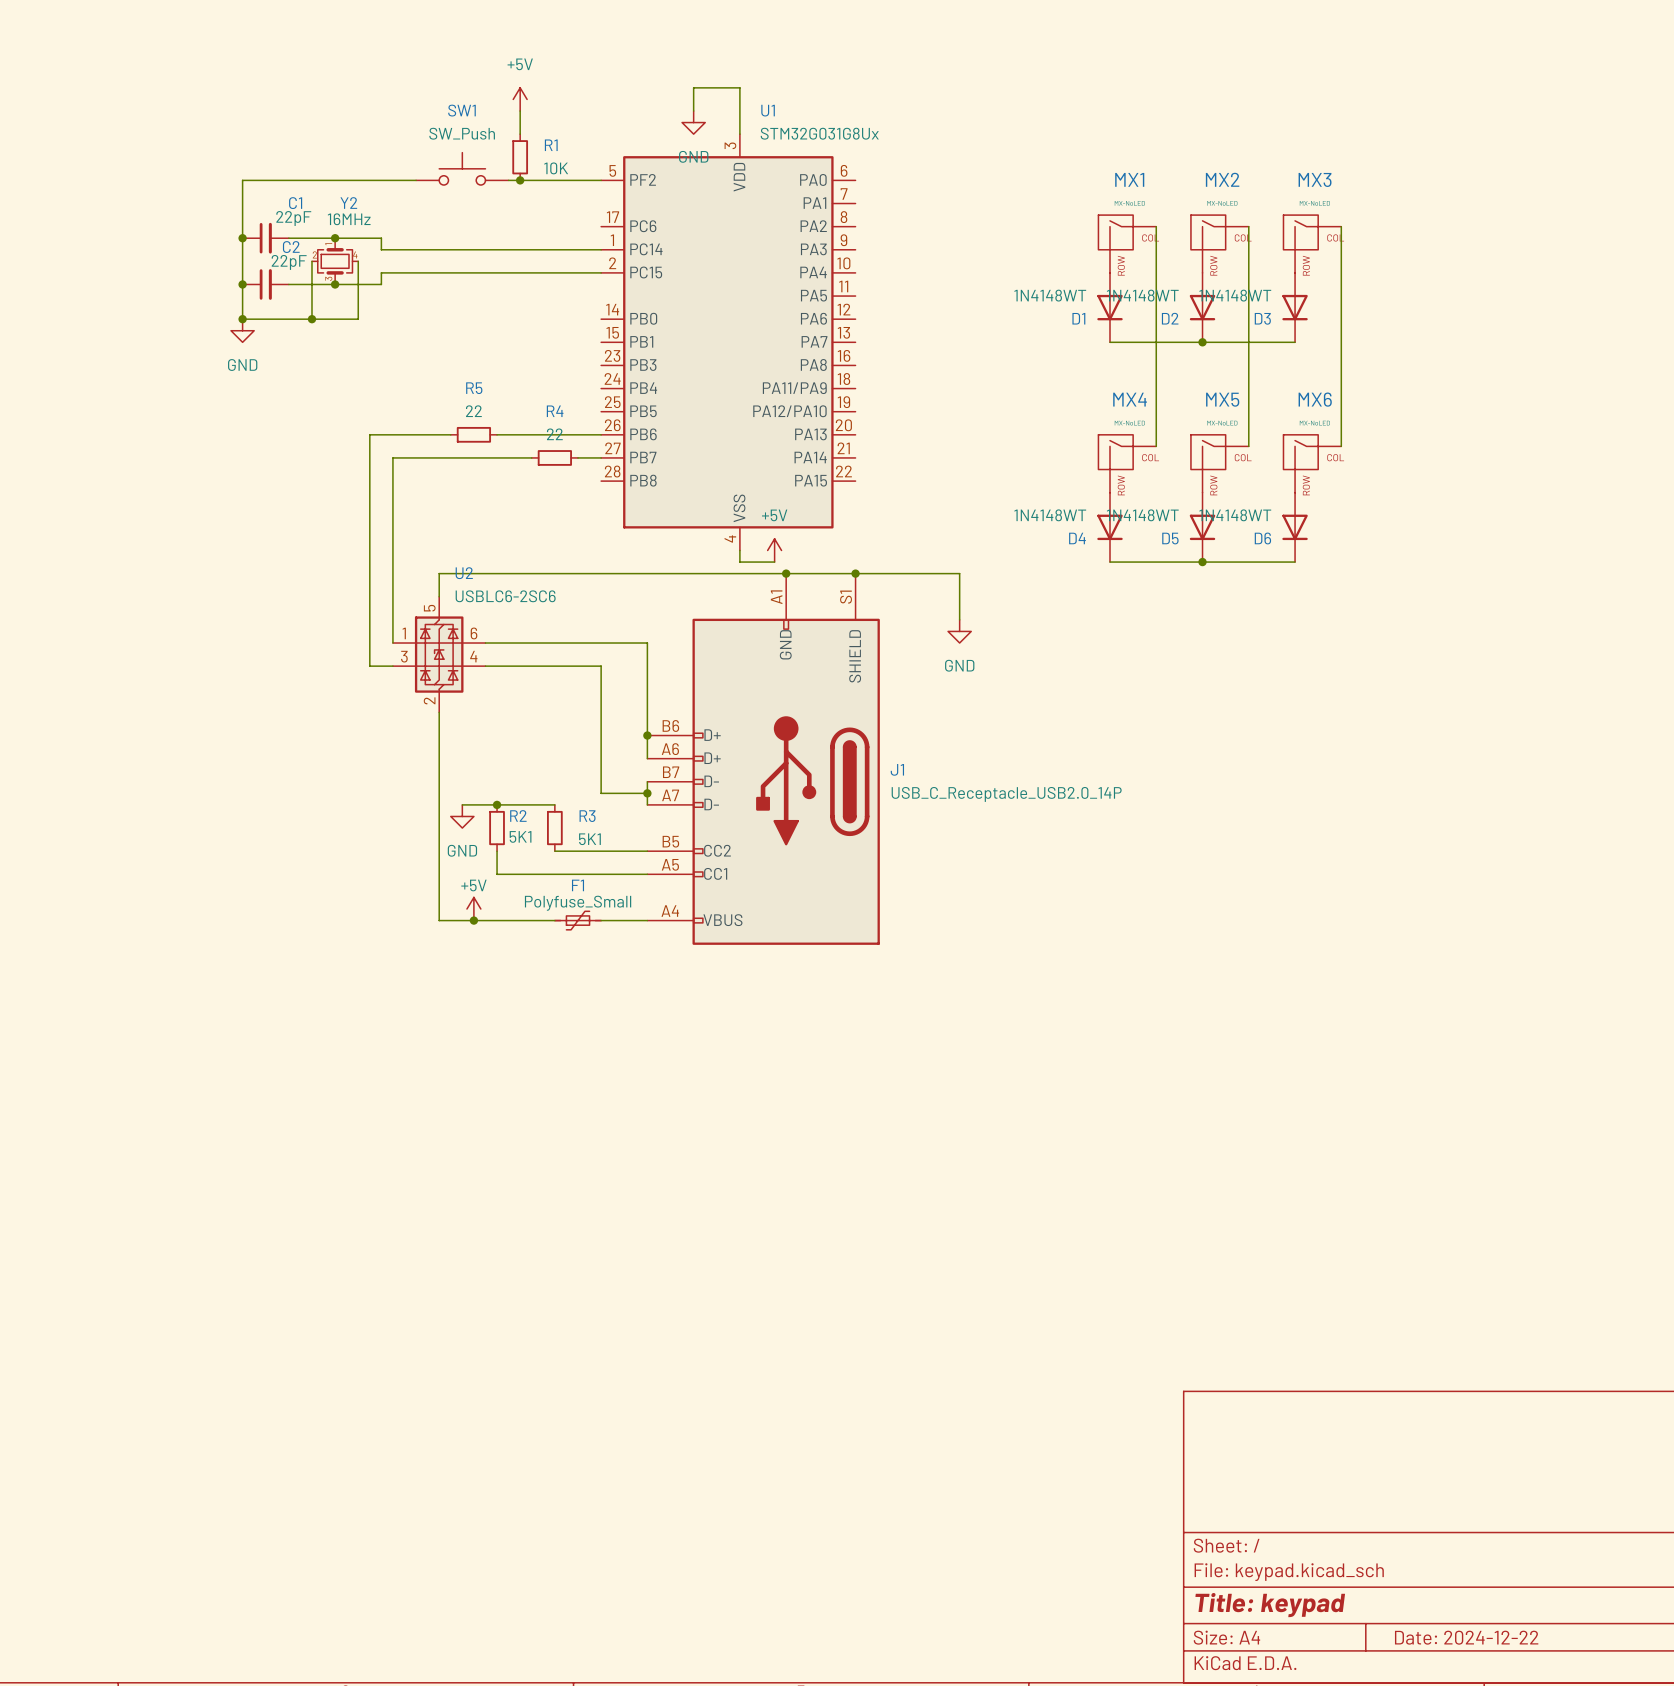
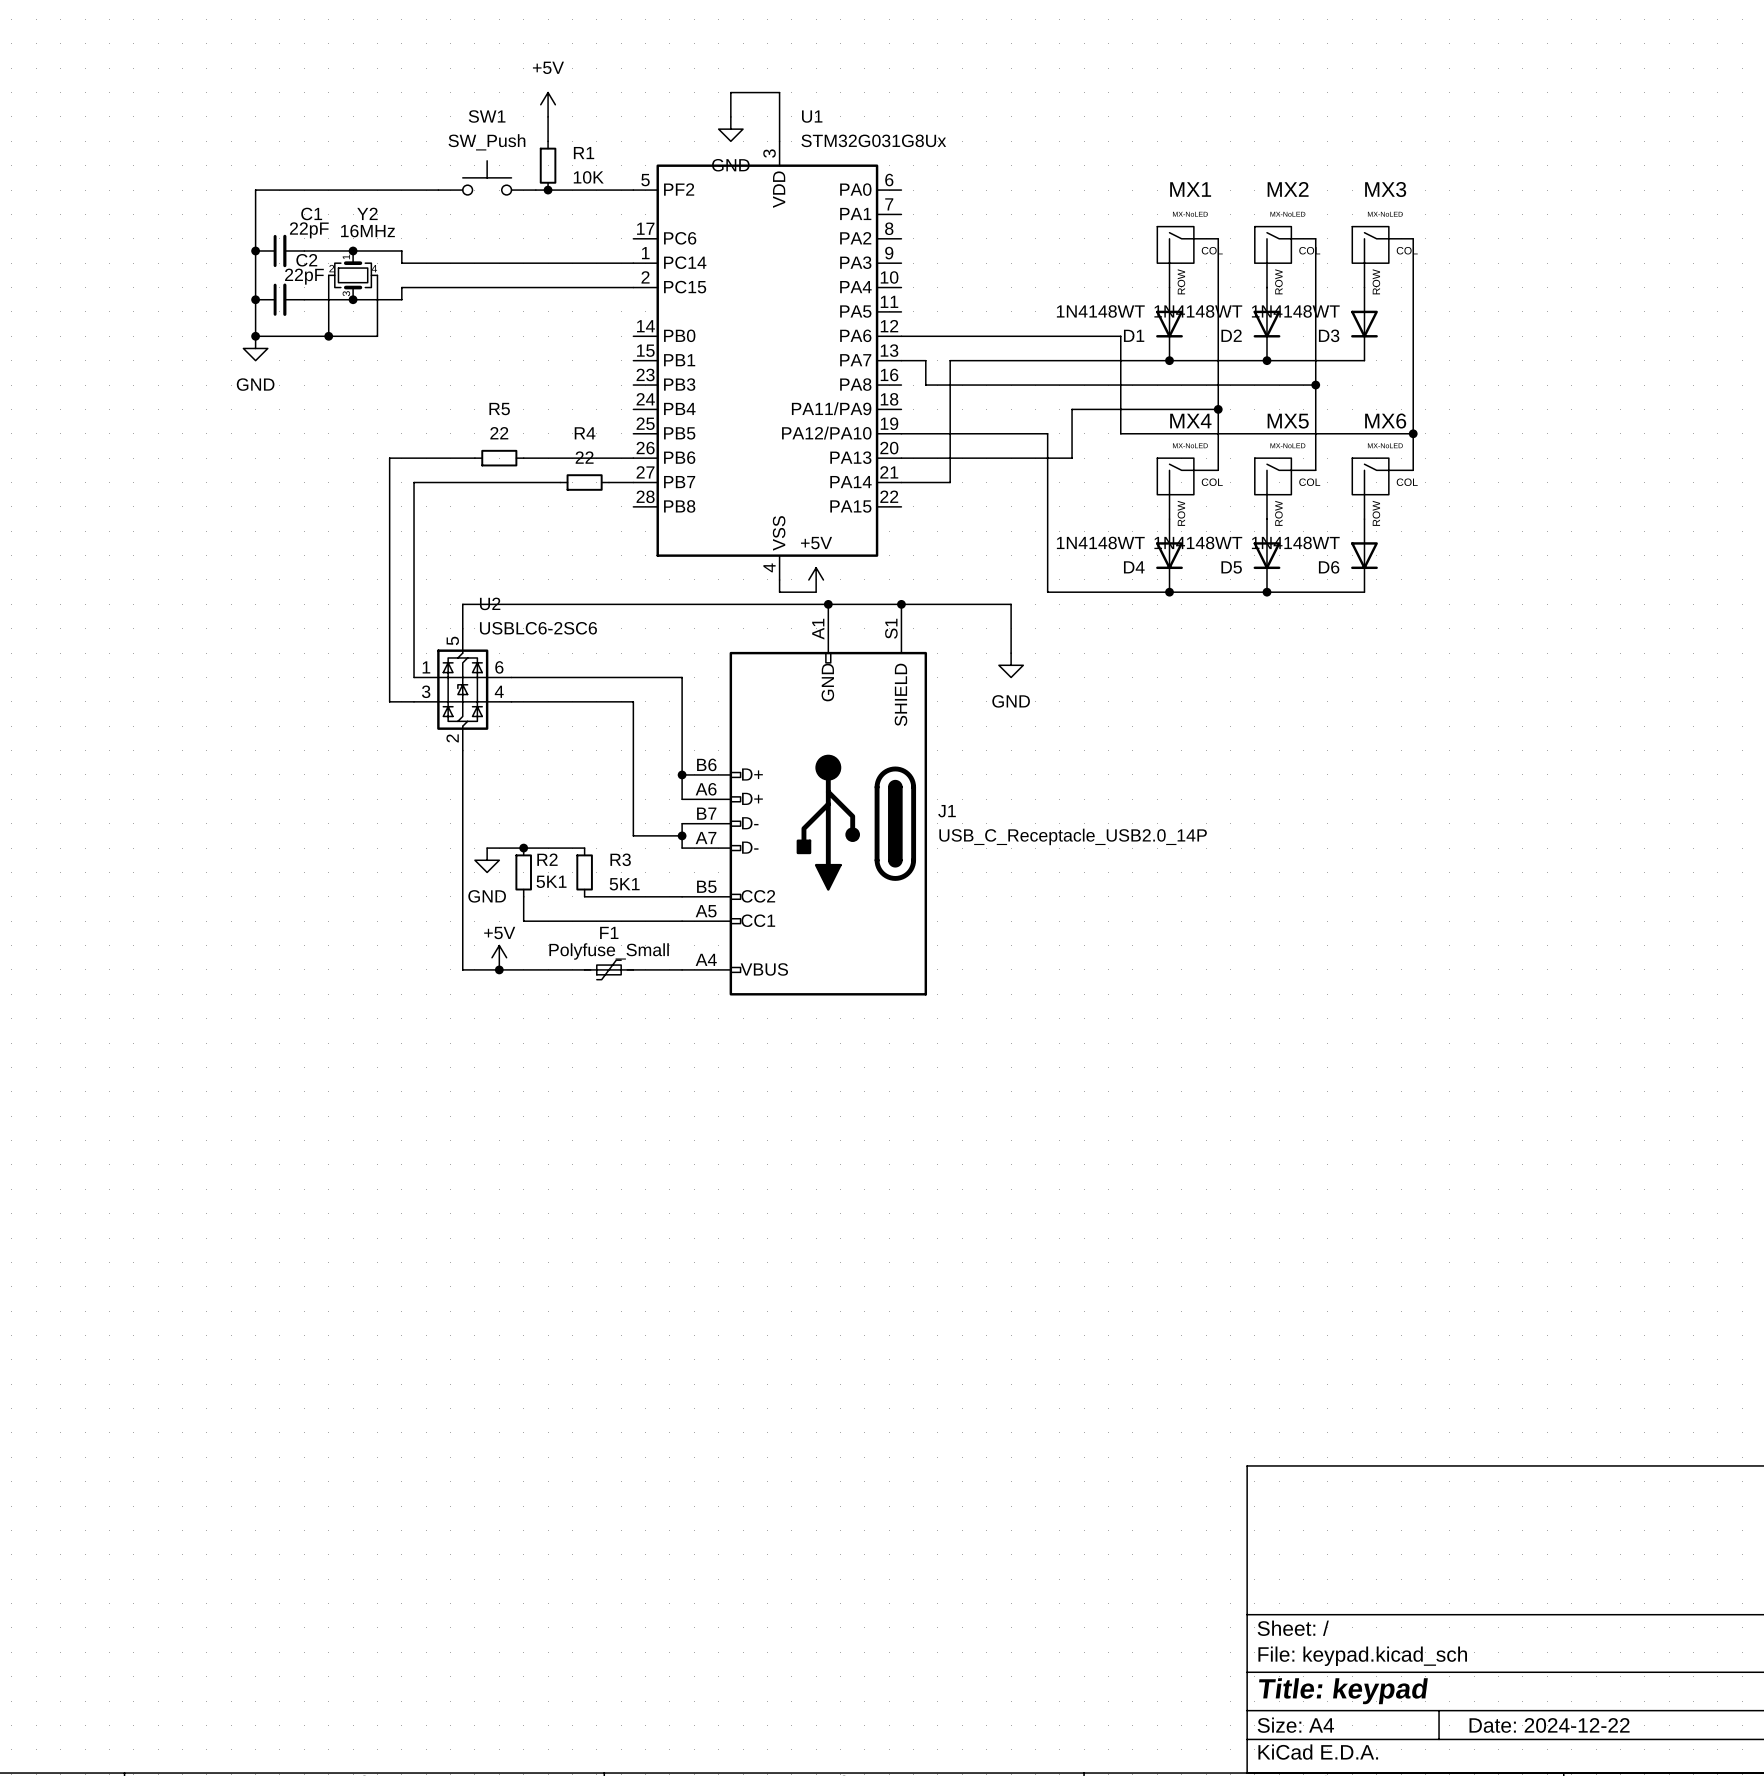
wire: none -> (901, 336) (1120, 336) (1120, 433) (1413, 433)
wire: none -> (901, 360) (925, 360) (925, 385) (1315, 385)
wire: none -> (1169, 360) (950, 360) (950, 482) (901, 482)
junction: none -> (1169, 360)
junction: none -> (1315, 385)
wire: none -> (1218, 409) (1072, 409) (1072, 458) (901, 458)
junction: none -> (1218, 409)
wire: none -> (901, 433) (1047, 433) (1047, 592) (1169, 592)
junction: none -> (1413, 433)
junction: none -> (1169, 592)

